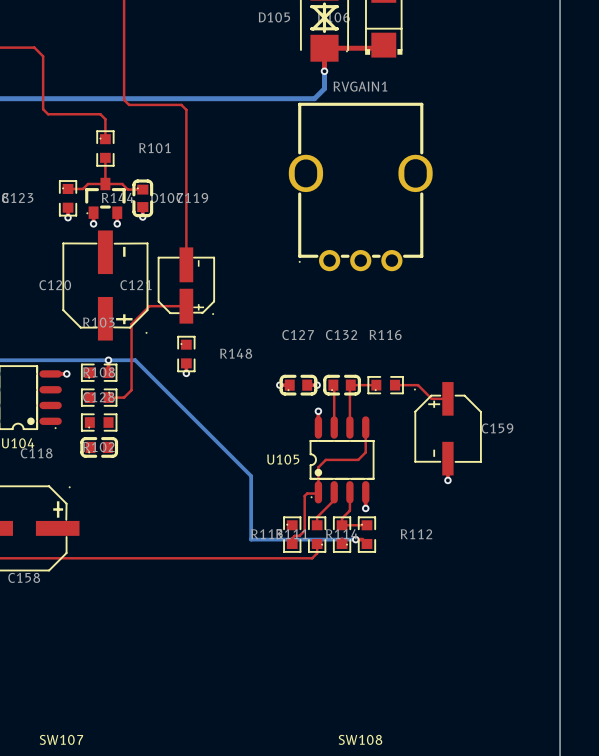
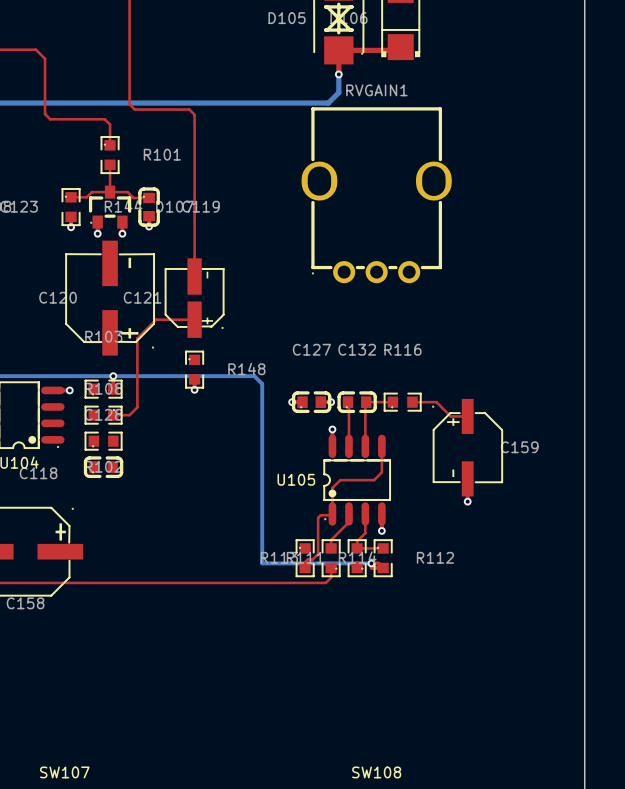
bottom track: (135, 360) (251, 476) -> (141, 376) (254, 376) (262, 383) (262, 497)
top track: none -> (371, 567) (383, 567)

